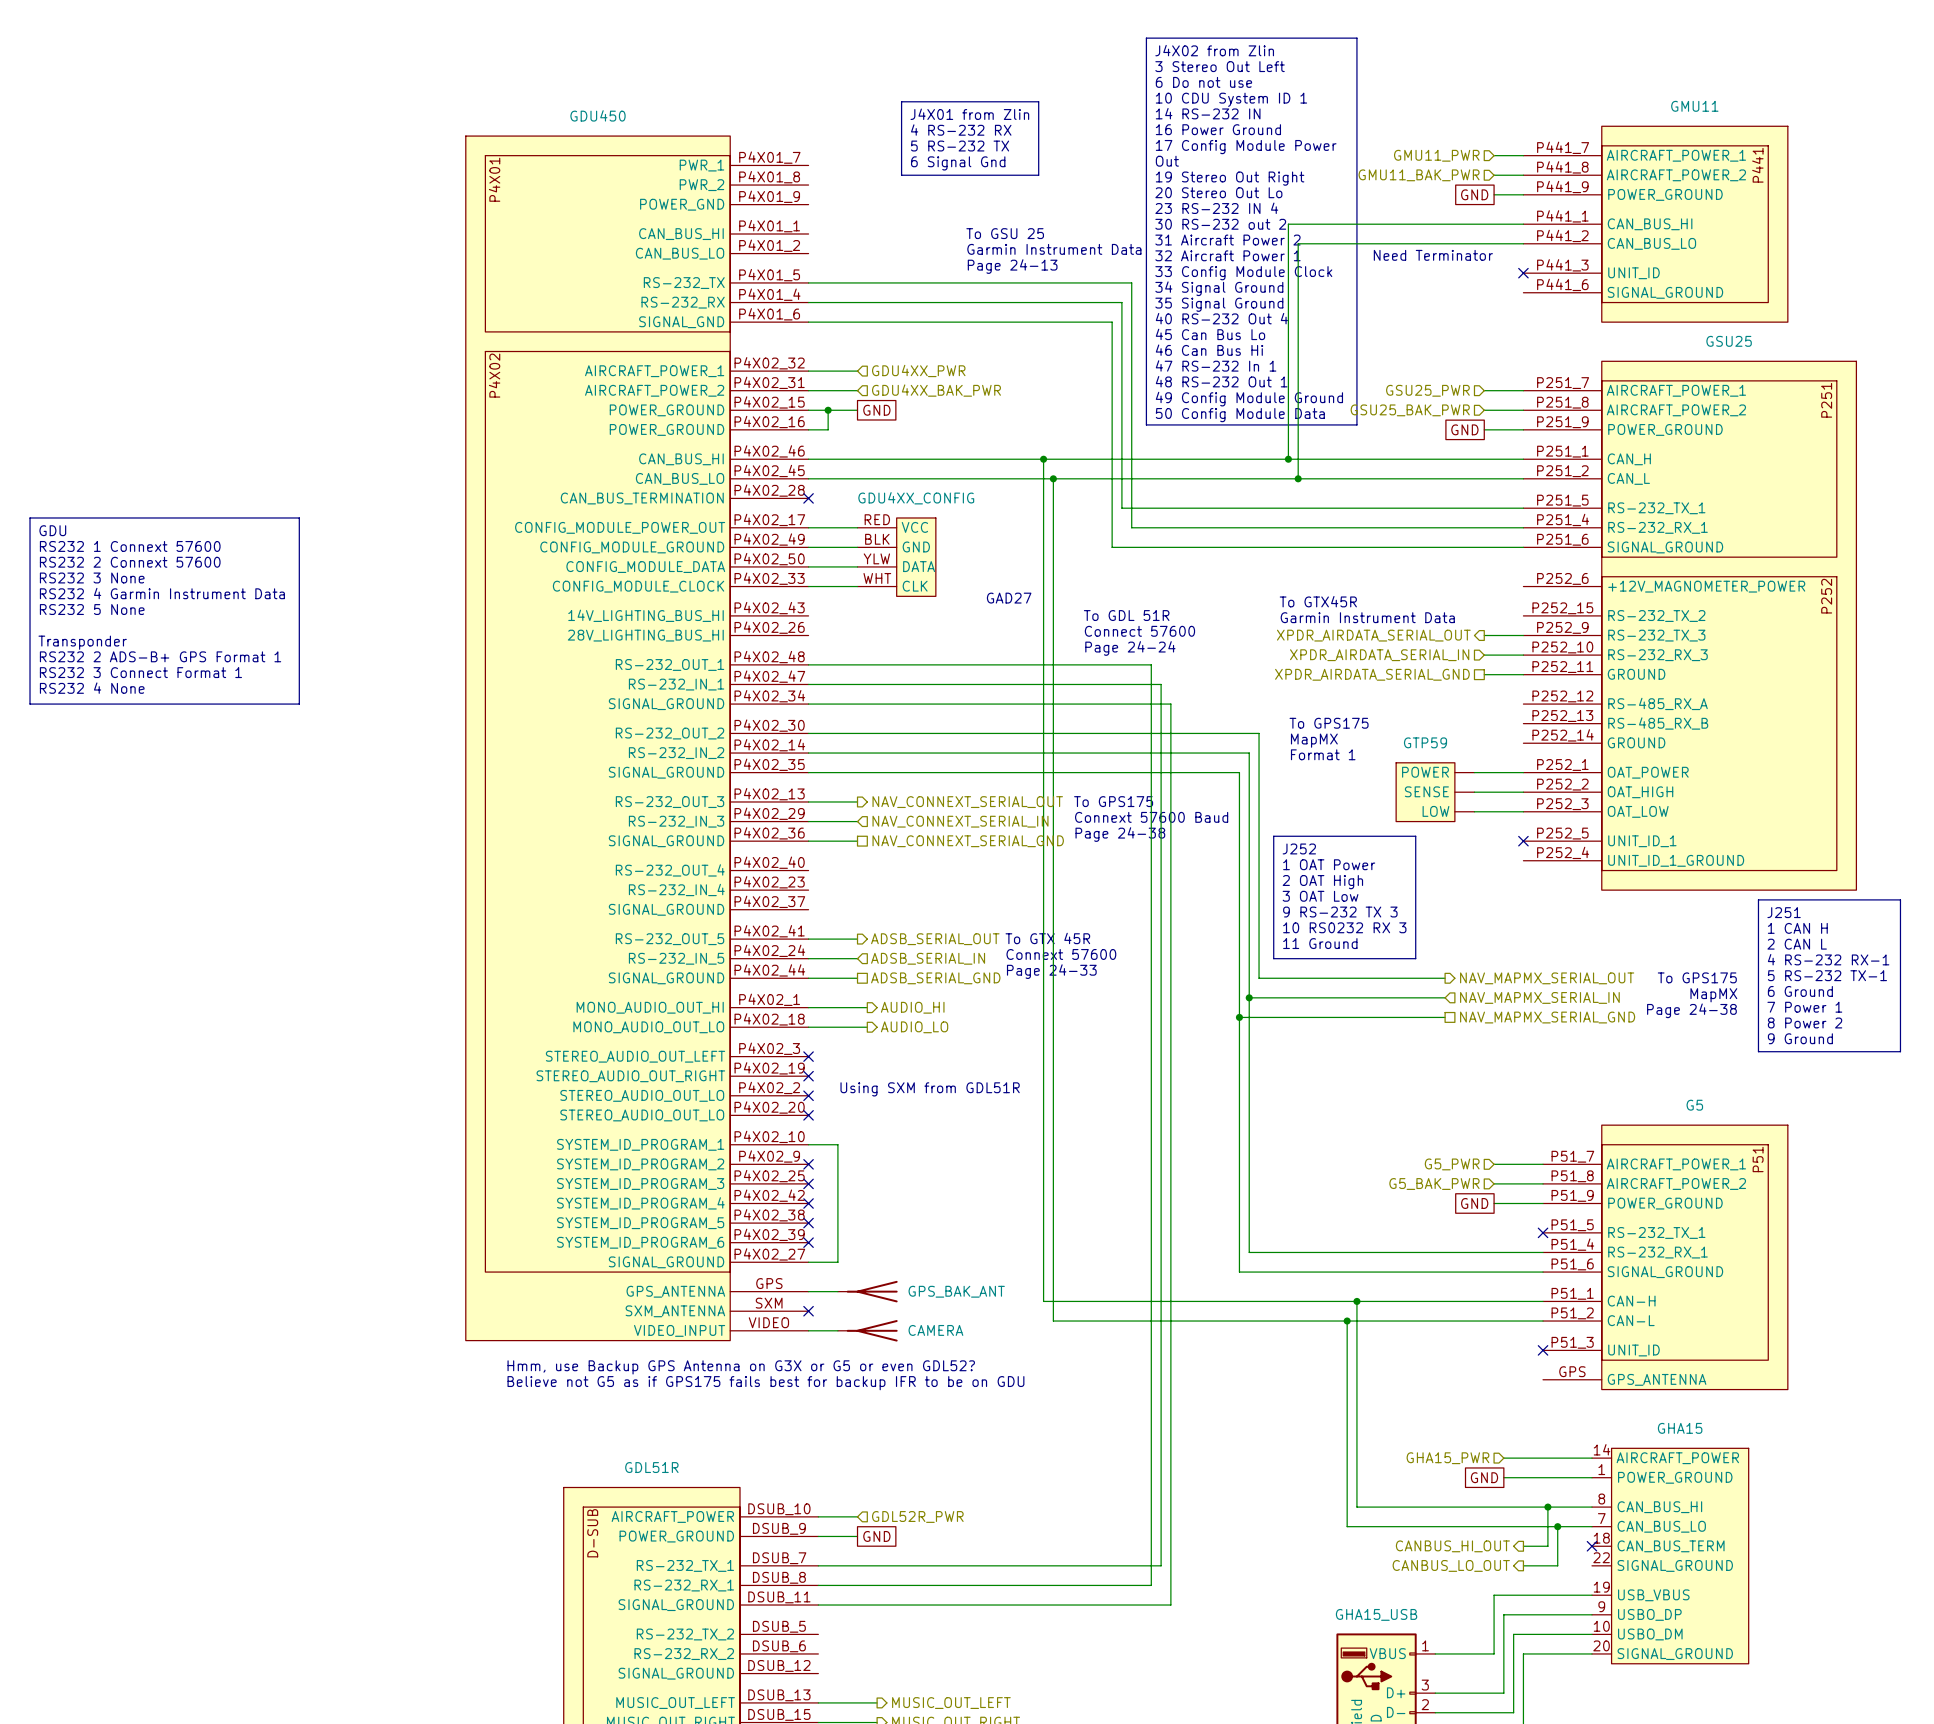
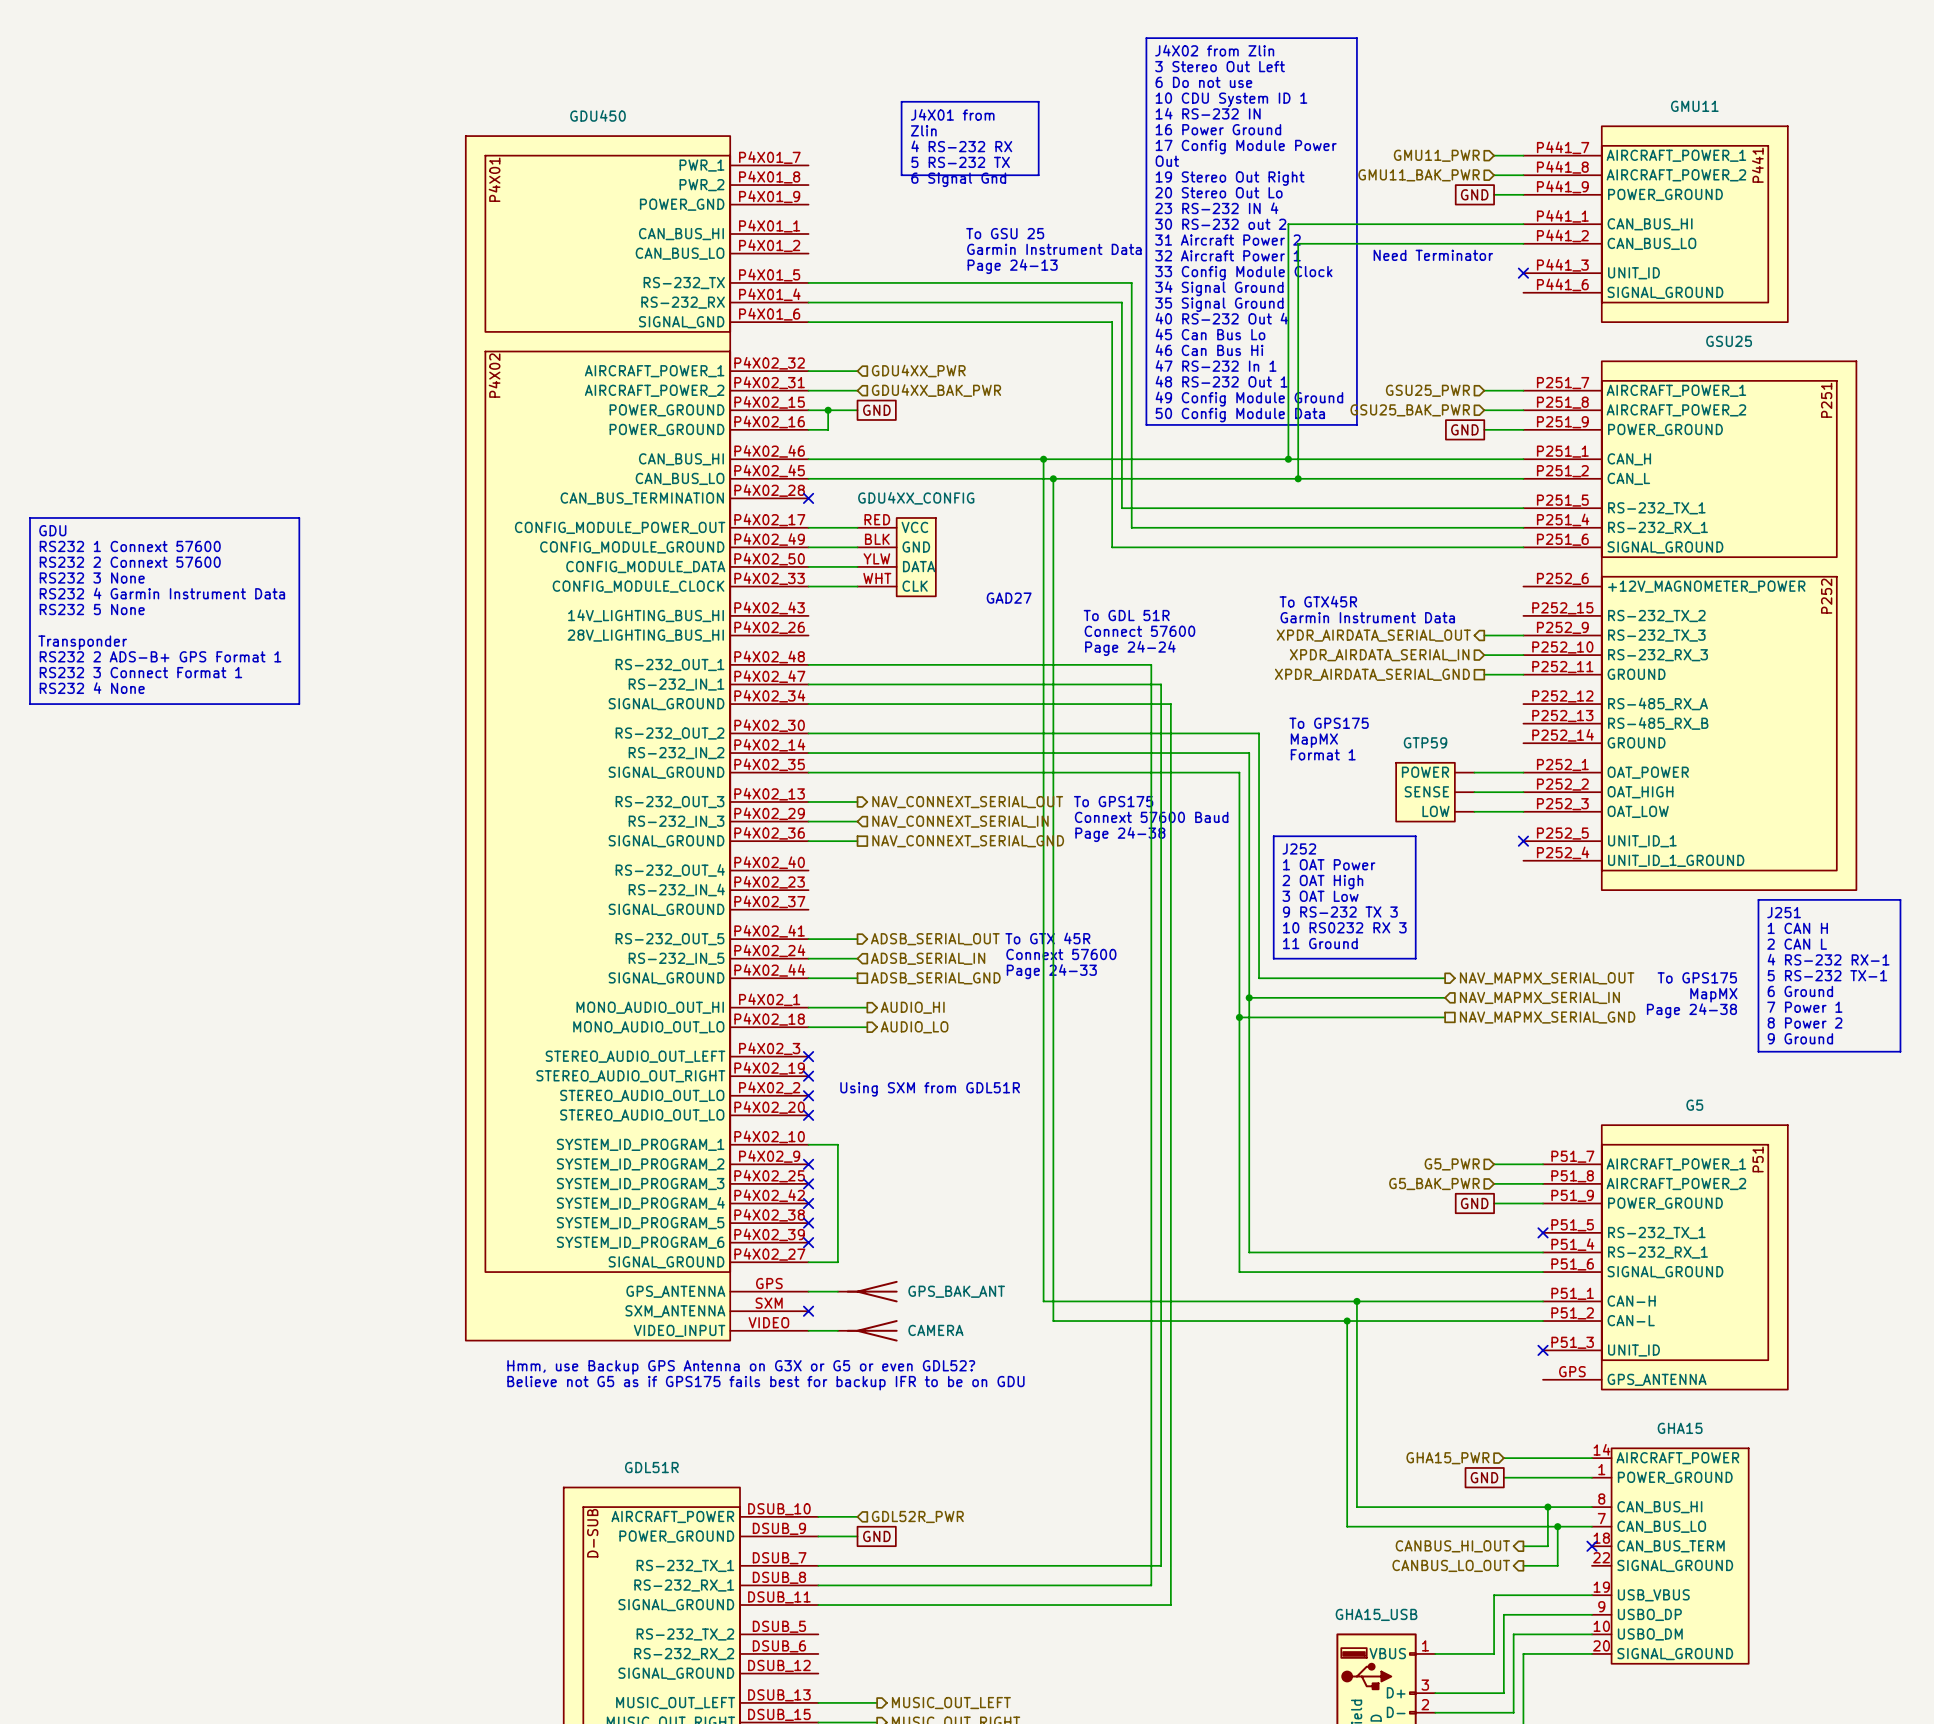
text: J4X01 from Zlin (969, 114) -> J4X01 from (952, 114)
text: 4 RS-232 RX (961, 130) -> Zlin (923, 130)
text: 5 RS-232 TX (960, 146) -> 4 RS-232 RX (961, 146)
text: 6 Signal Gnd (958, 163) -> 5 RS-232 TX (960, 162)
text: none -> 6 Signal Gnd (958, 179)

